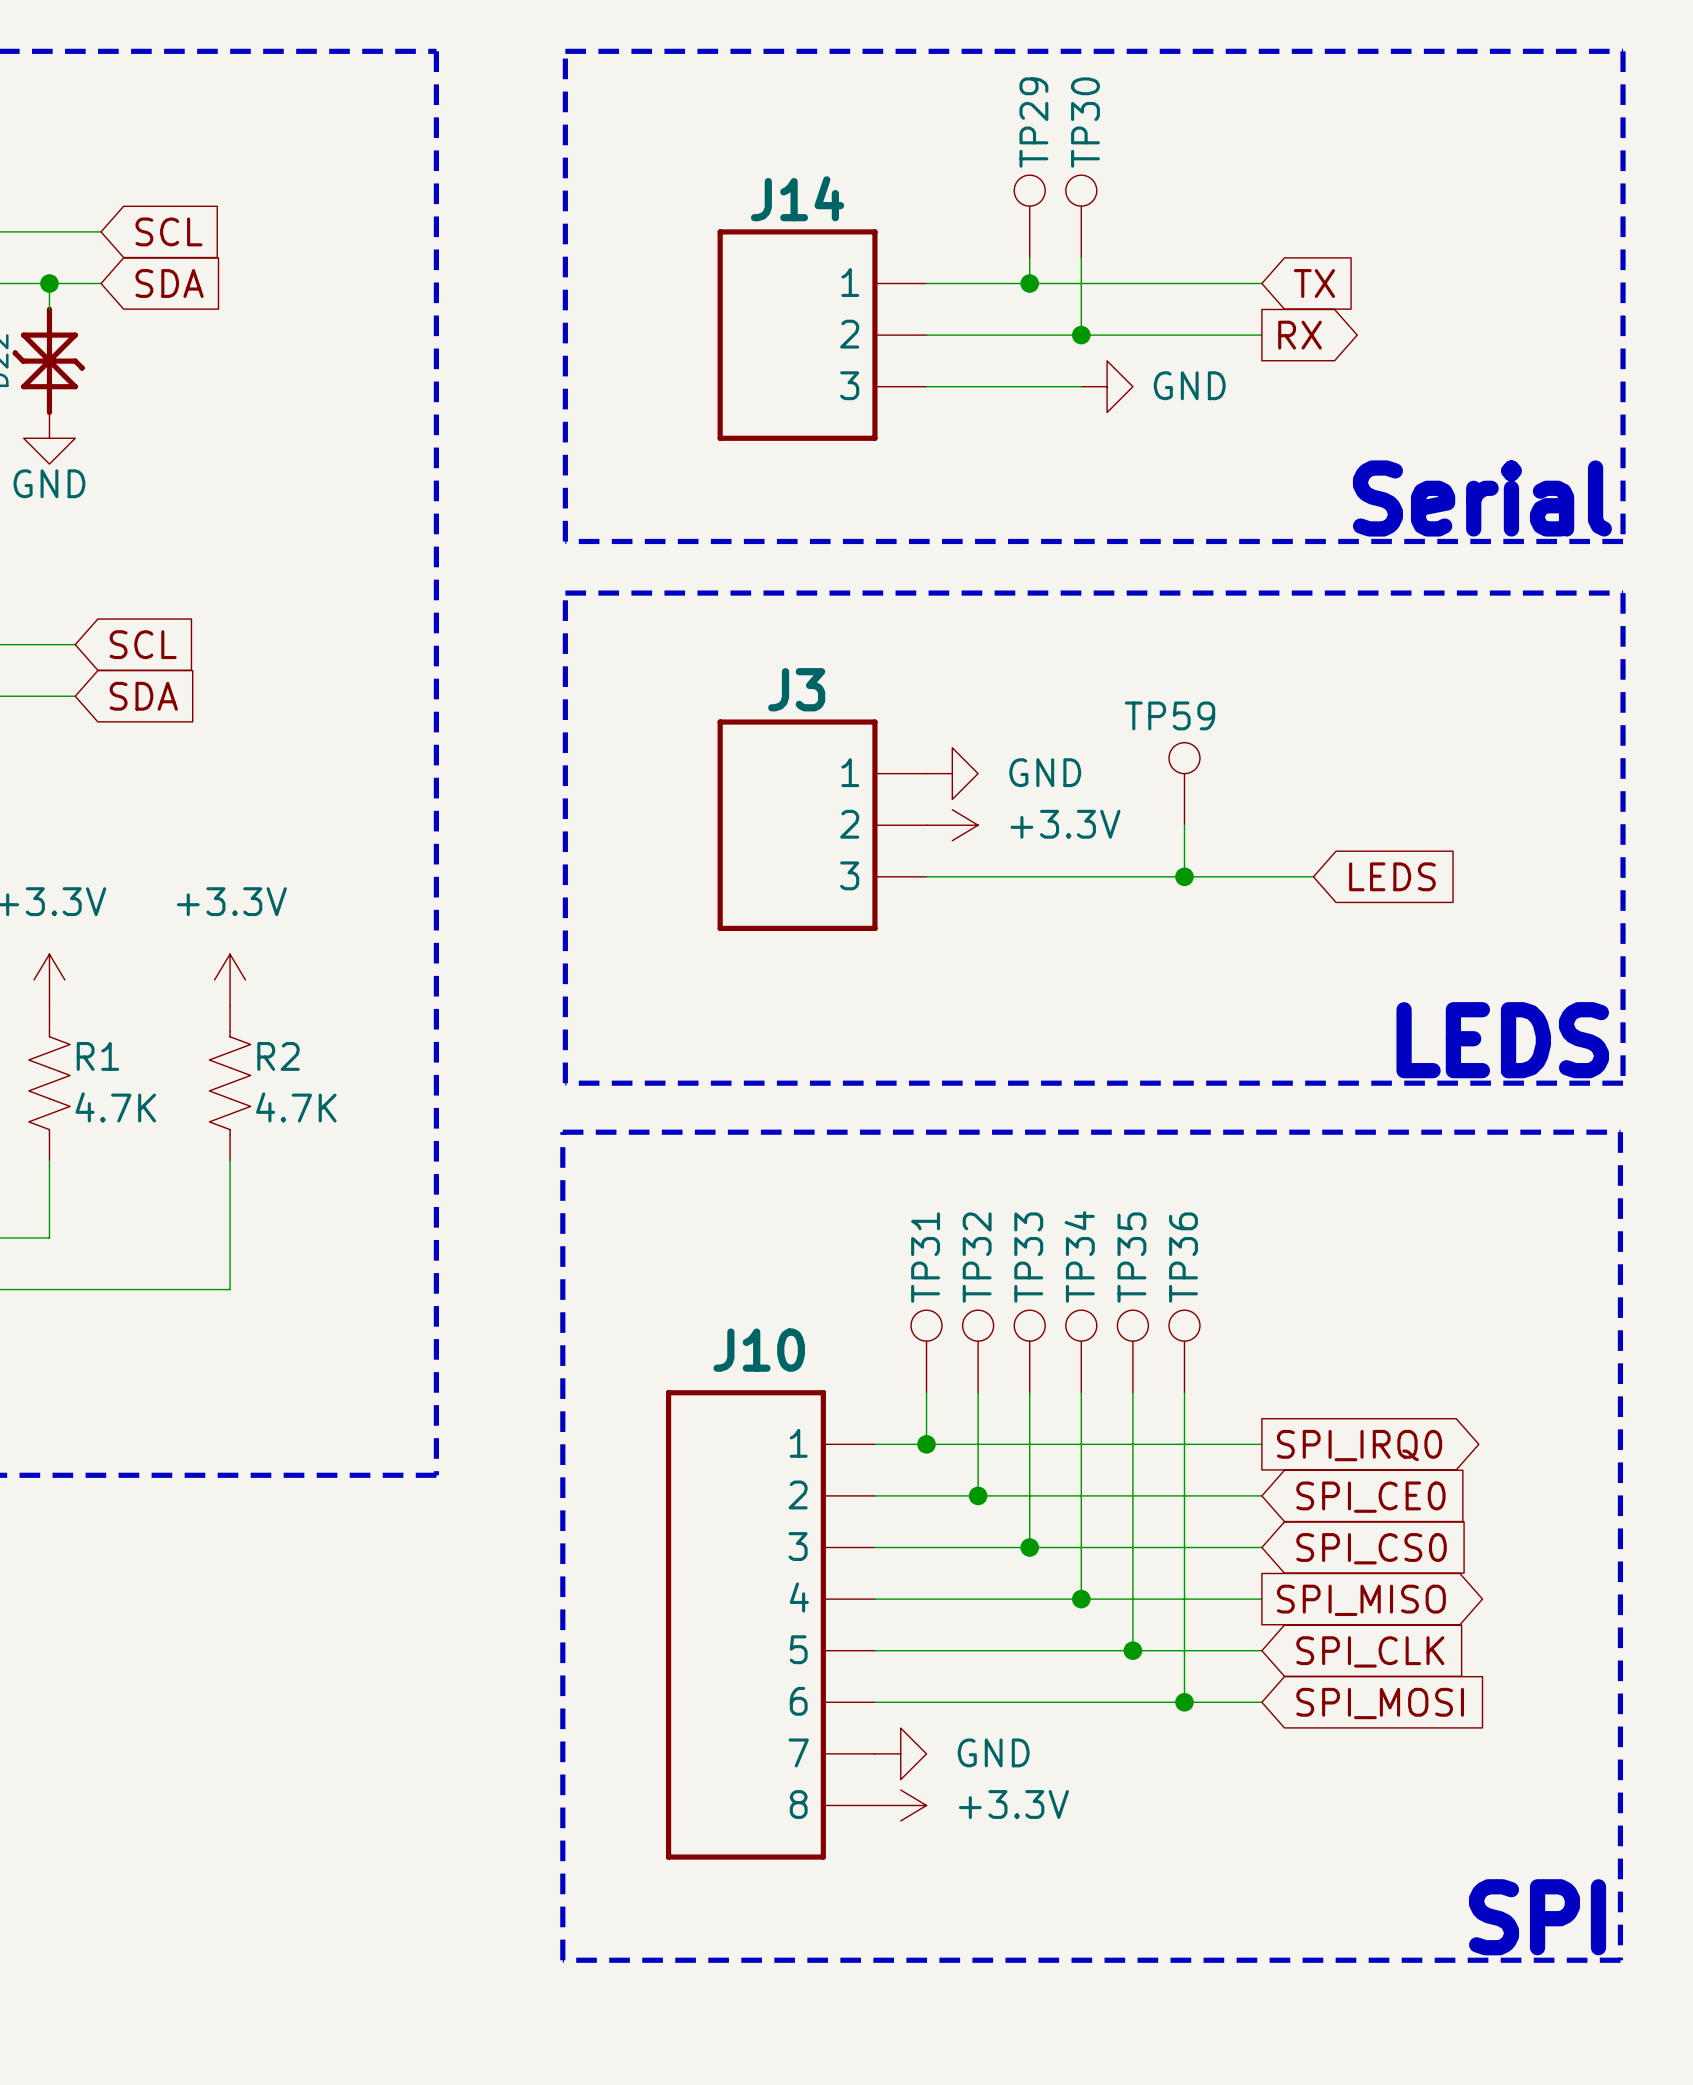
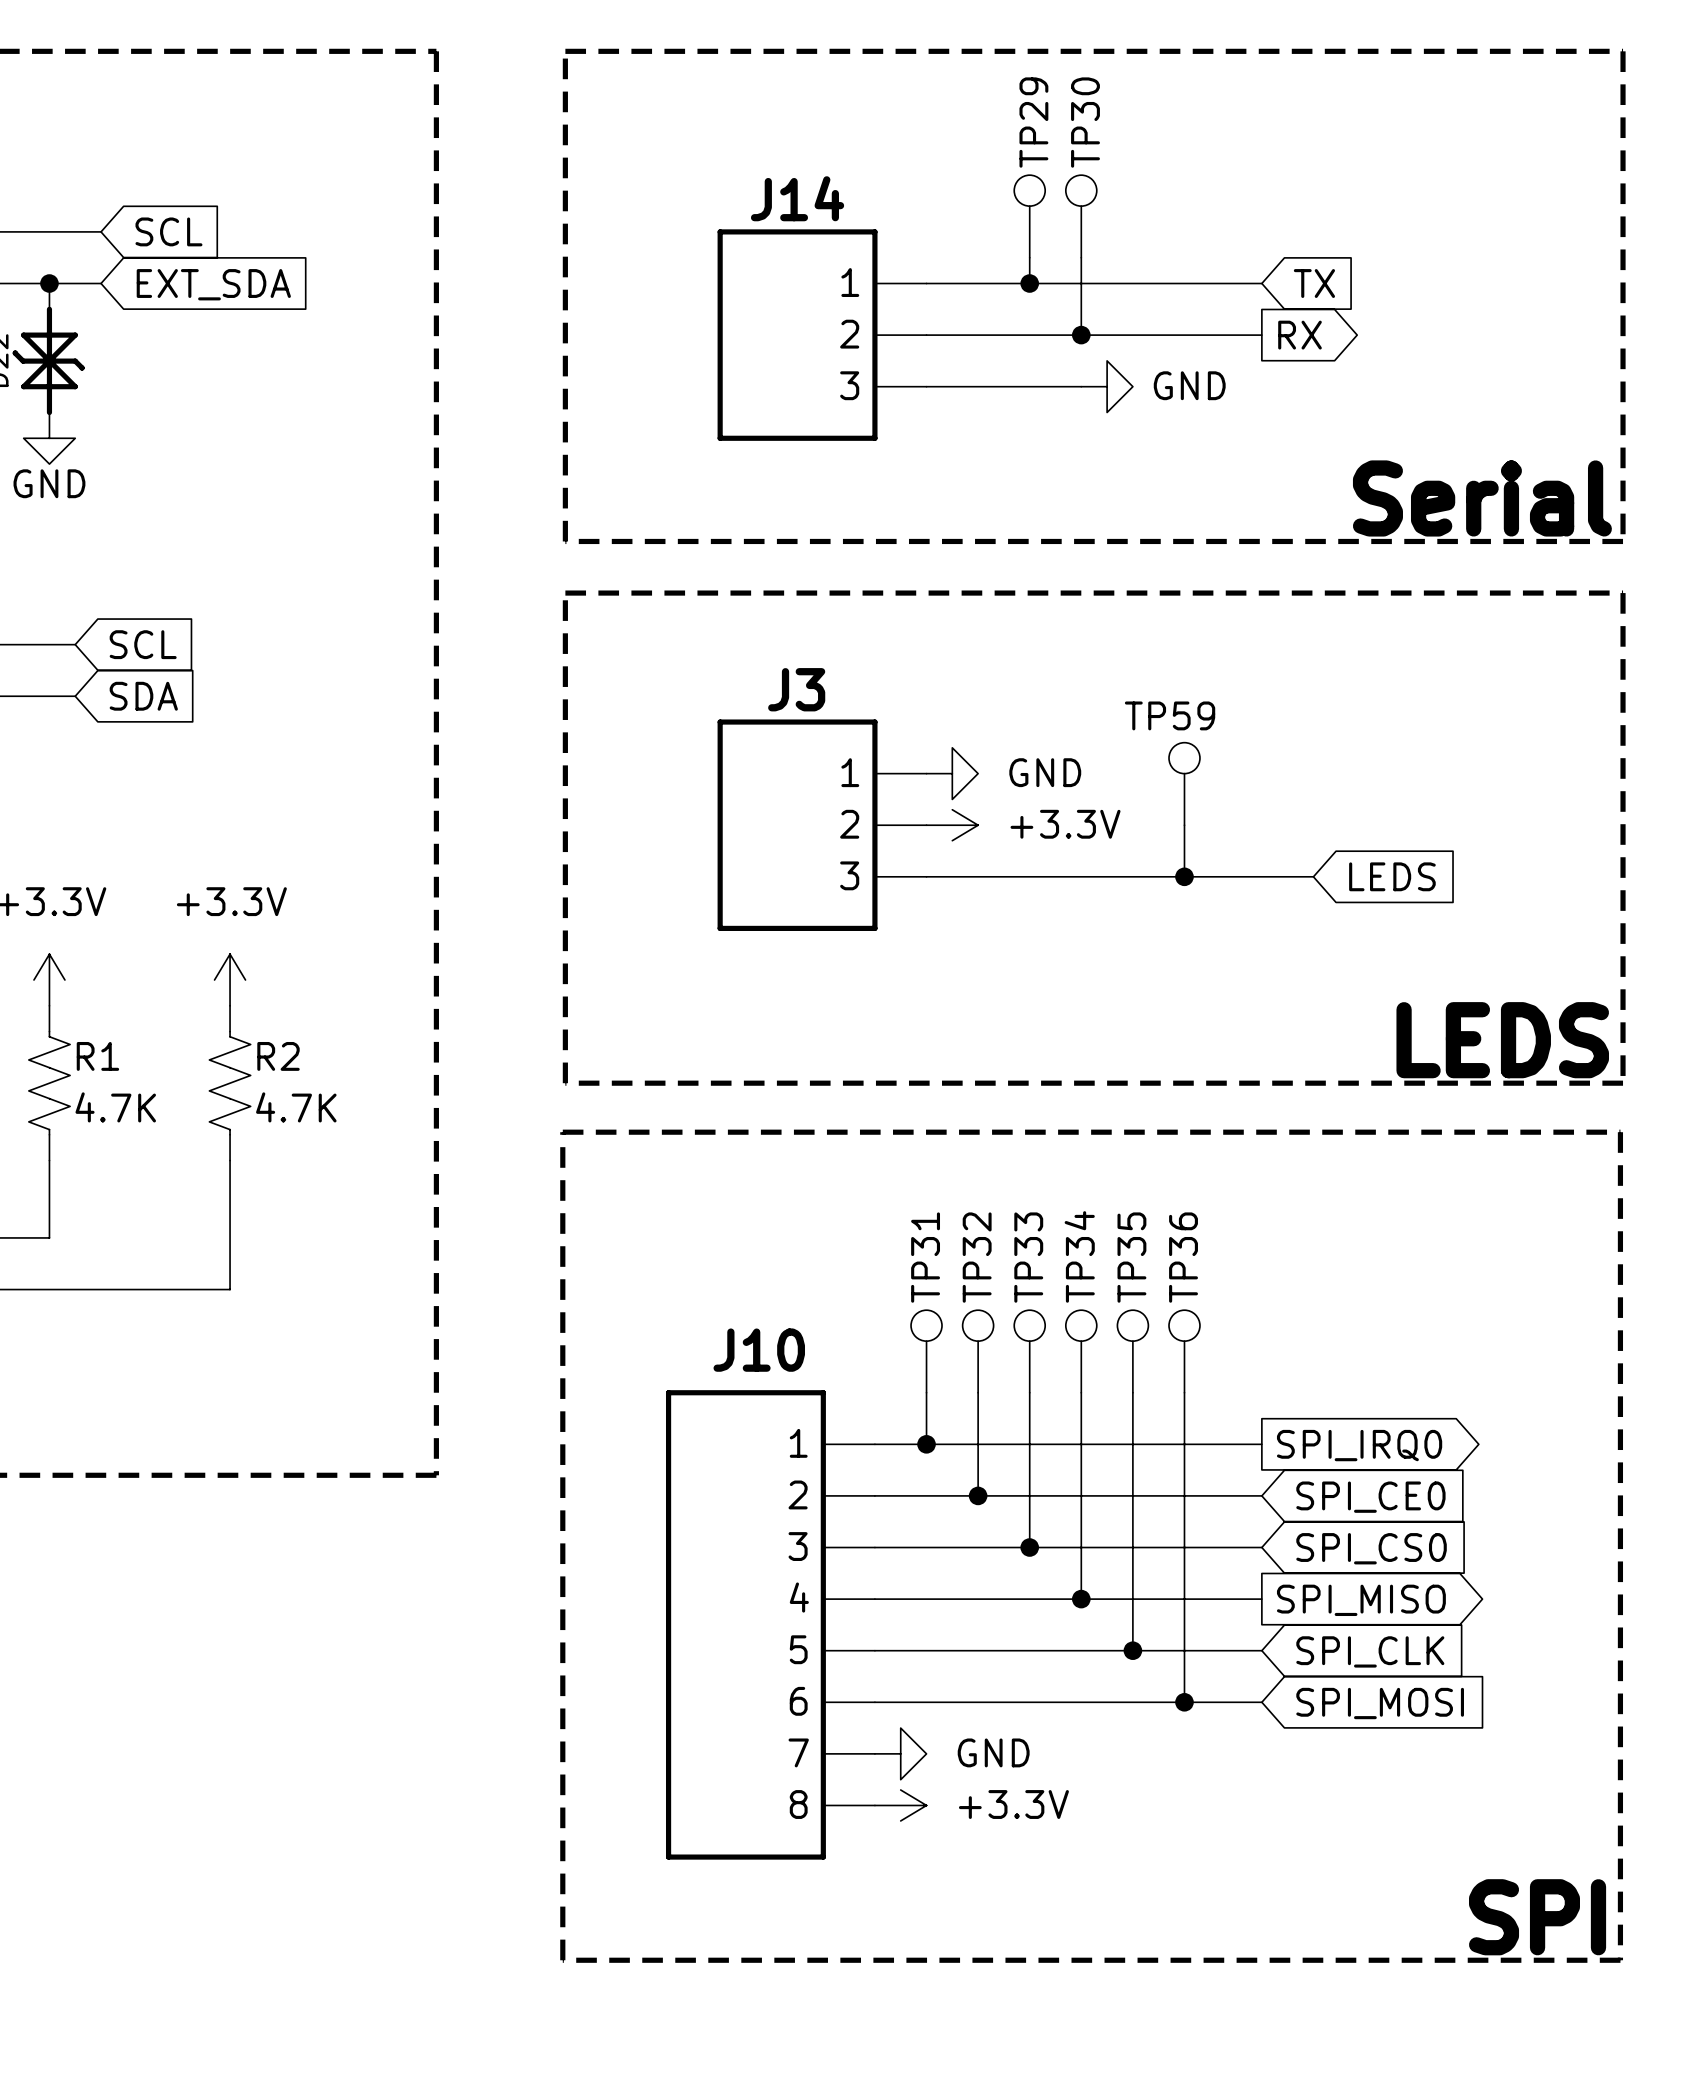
global label: SDA (169, 283) -> EXT_SDA (213, 284)

